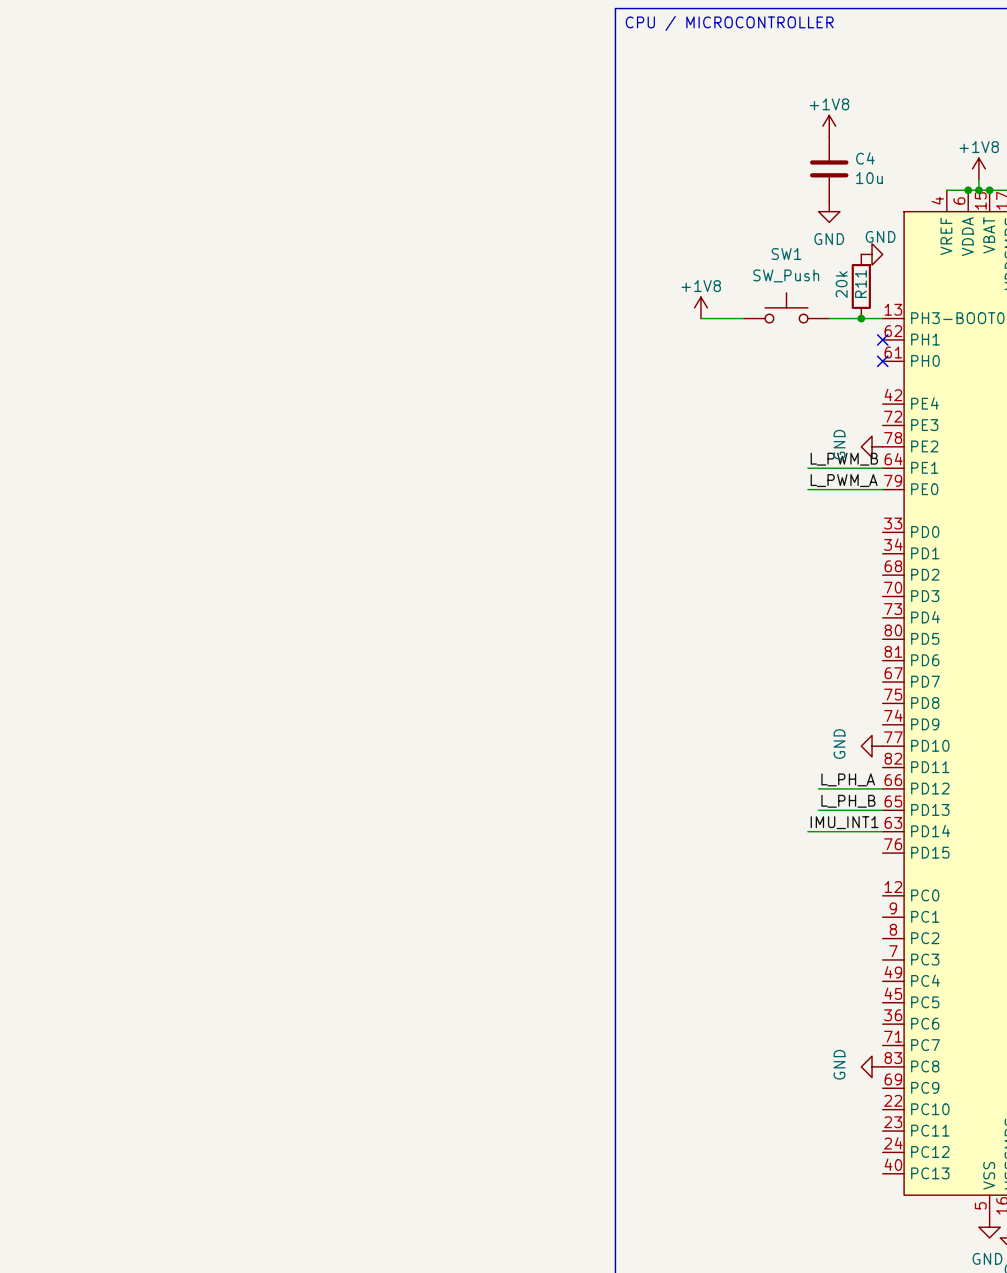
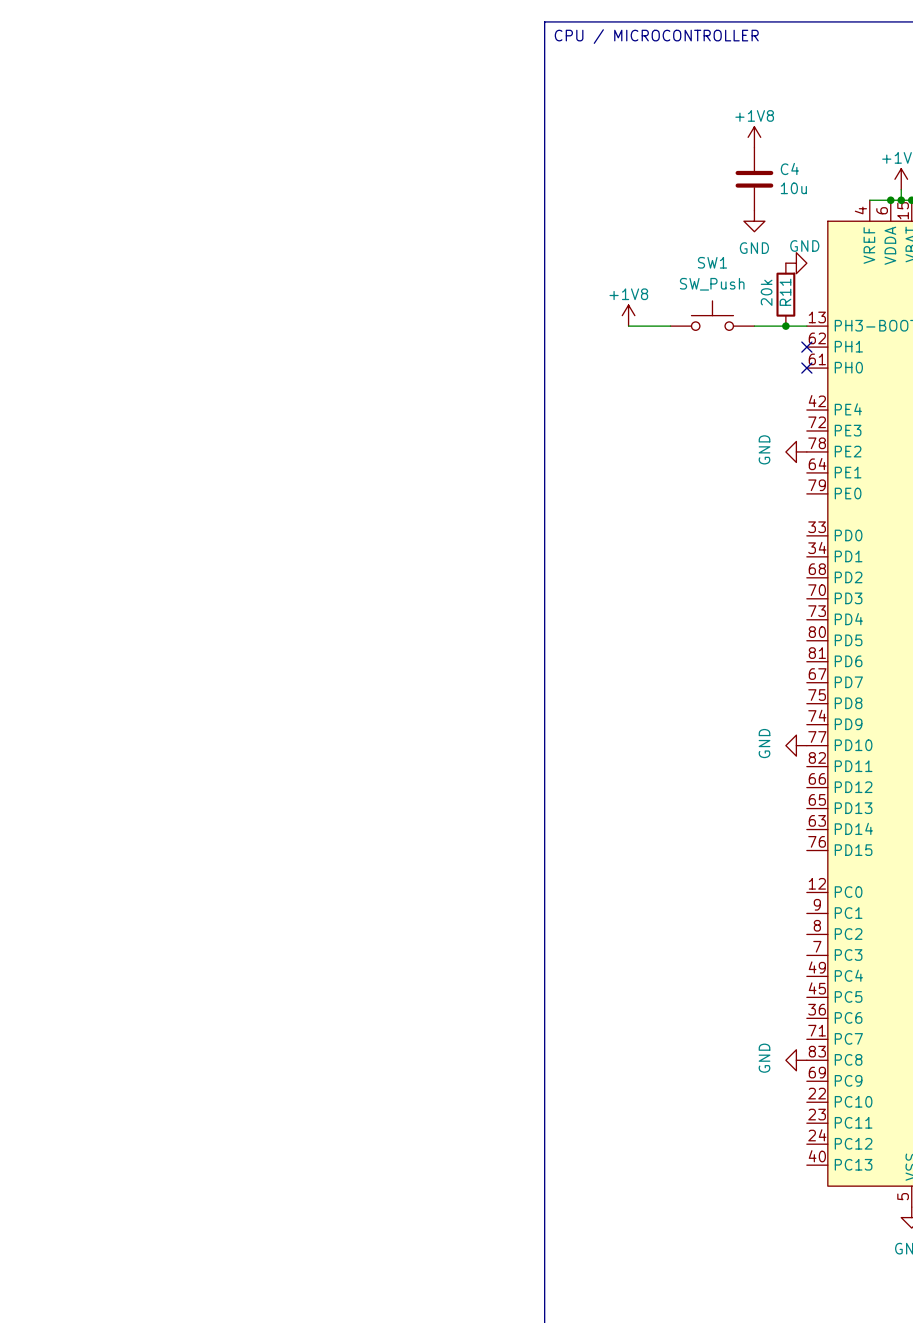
label: L_PWM_B (844, 459) -> none
wire: (807, 468) (882, 468) -> none
label: L_PWM_A (844, 480) -> none
wire: (807, 489) (882, 489) -> none
label: L_PH_A (848, 779) -> none
wire: (818, 788) (882, 788) -> none
label: L_PH_B (848, 801) -> none
wire: (818, 810) (882, 810) -> none
label: IMU_INT1 (844, 822) -> none
wire: (807, 831) (882, 831) -> none

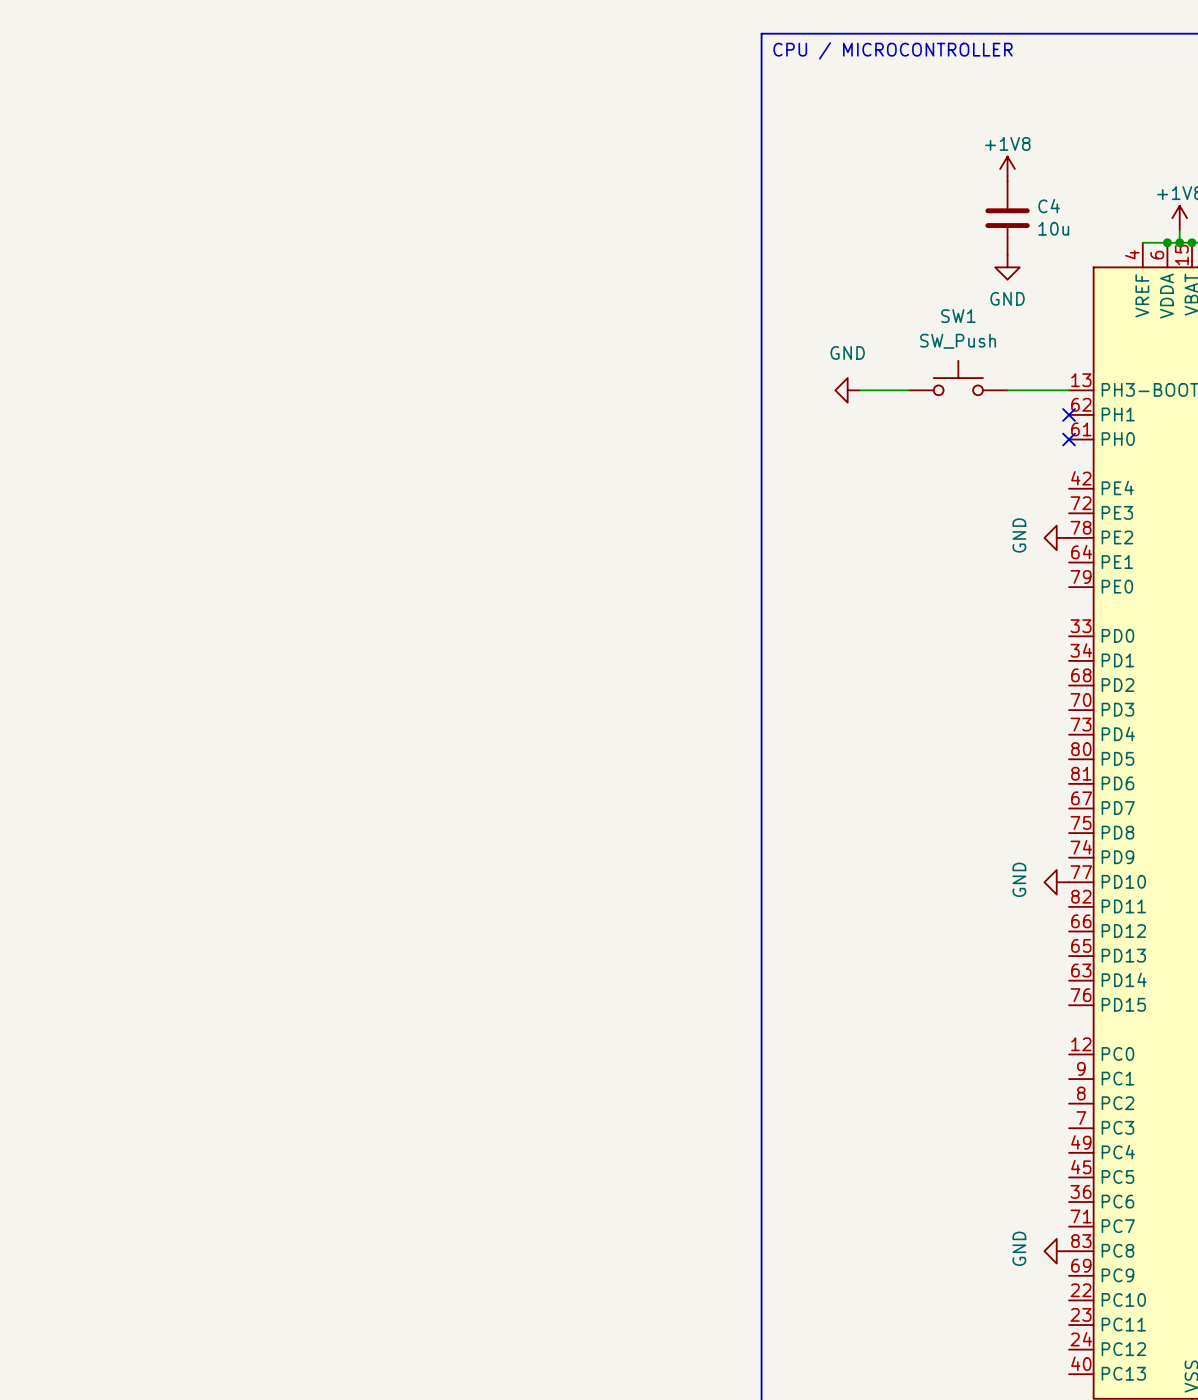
power symbol text position: GND (804, 246) -> GND (847, 352)
power symbol rotation: 0° (796, 263) -> 180° (847, 390)
power symbol position: GND (796, 263) -> GND (847, 390)
R11: 20k (785, 294) -> none
power symbol: +1V8 (628, 315) -> none
junction: (785, 326) -> none

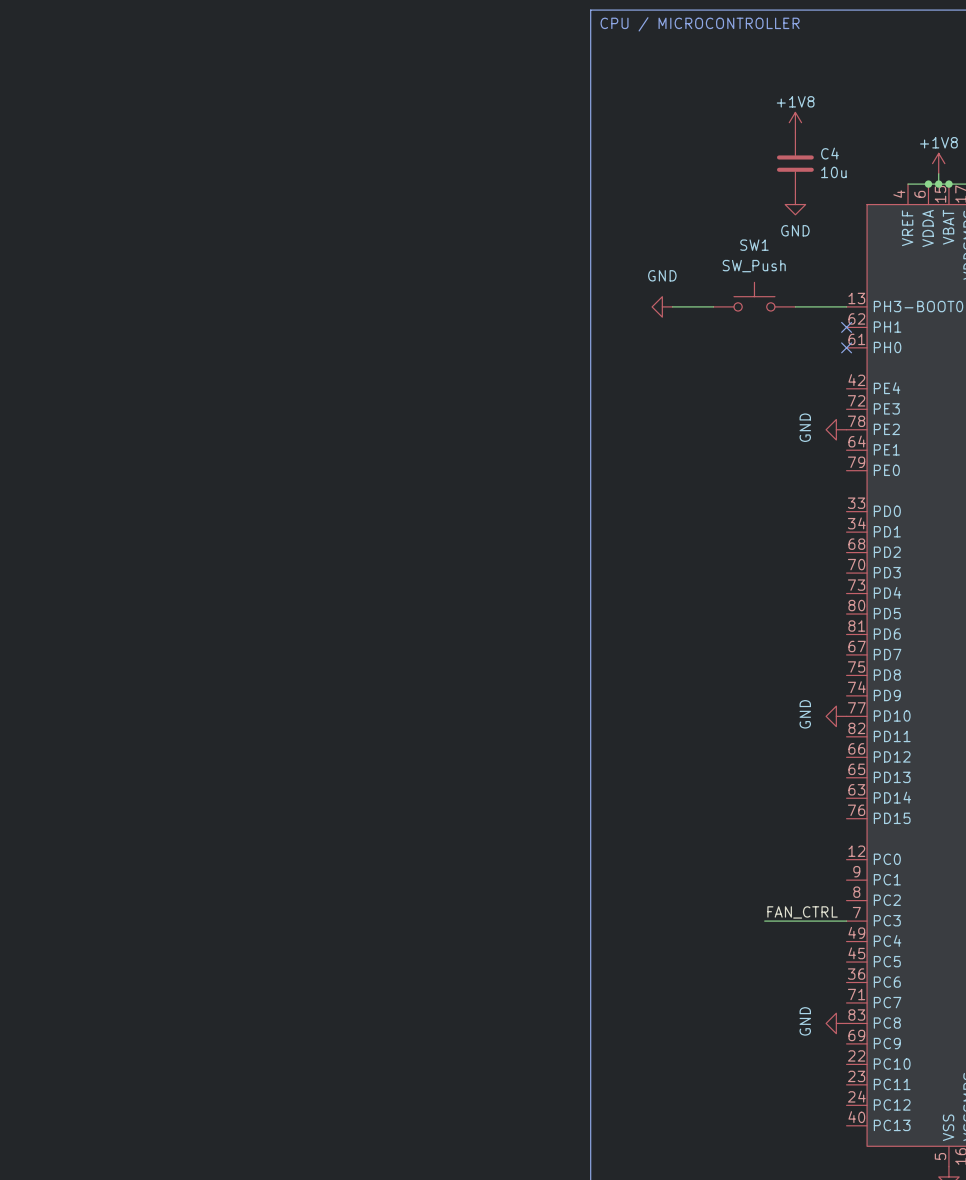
label: none -> FAN_CTRL (802, 912)
wire: none -> (764, 921) (846, 921)

